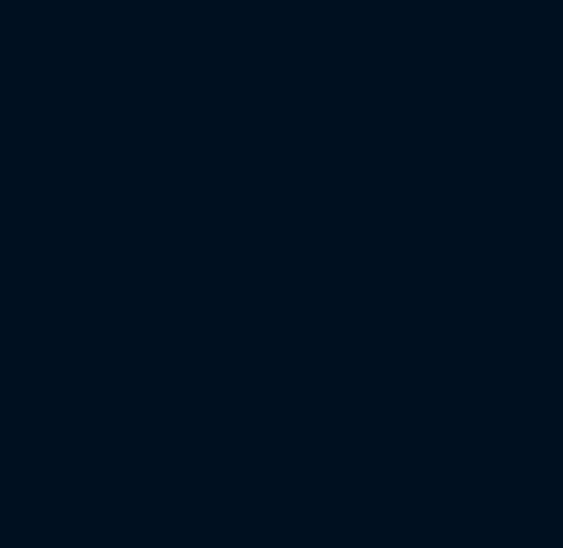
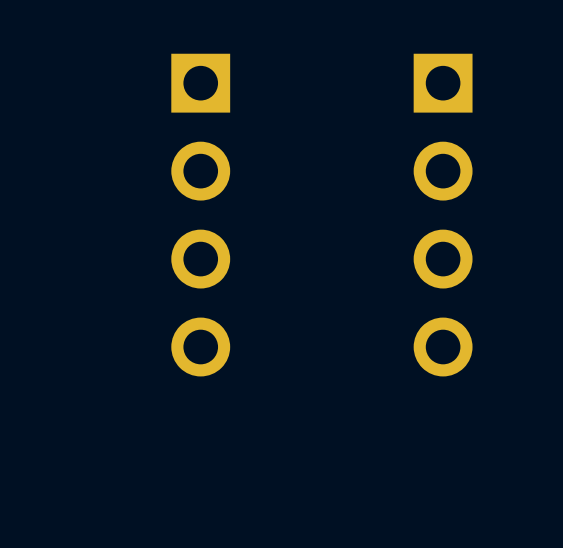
part: none -> (200, 215)
part: none -> (443, 215)

